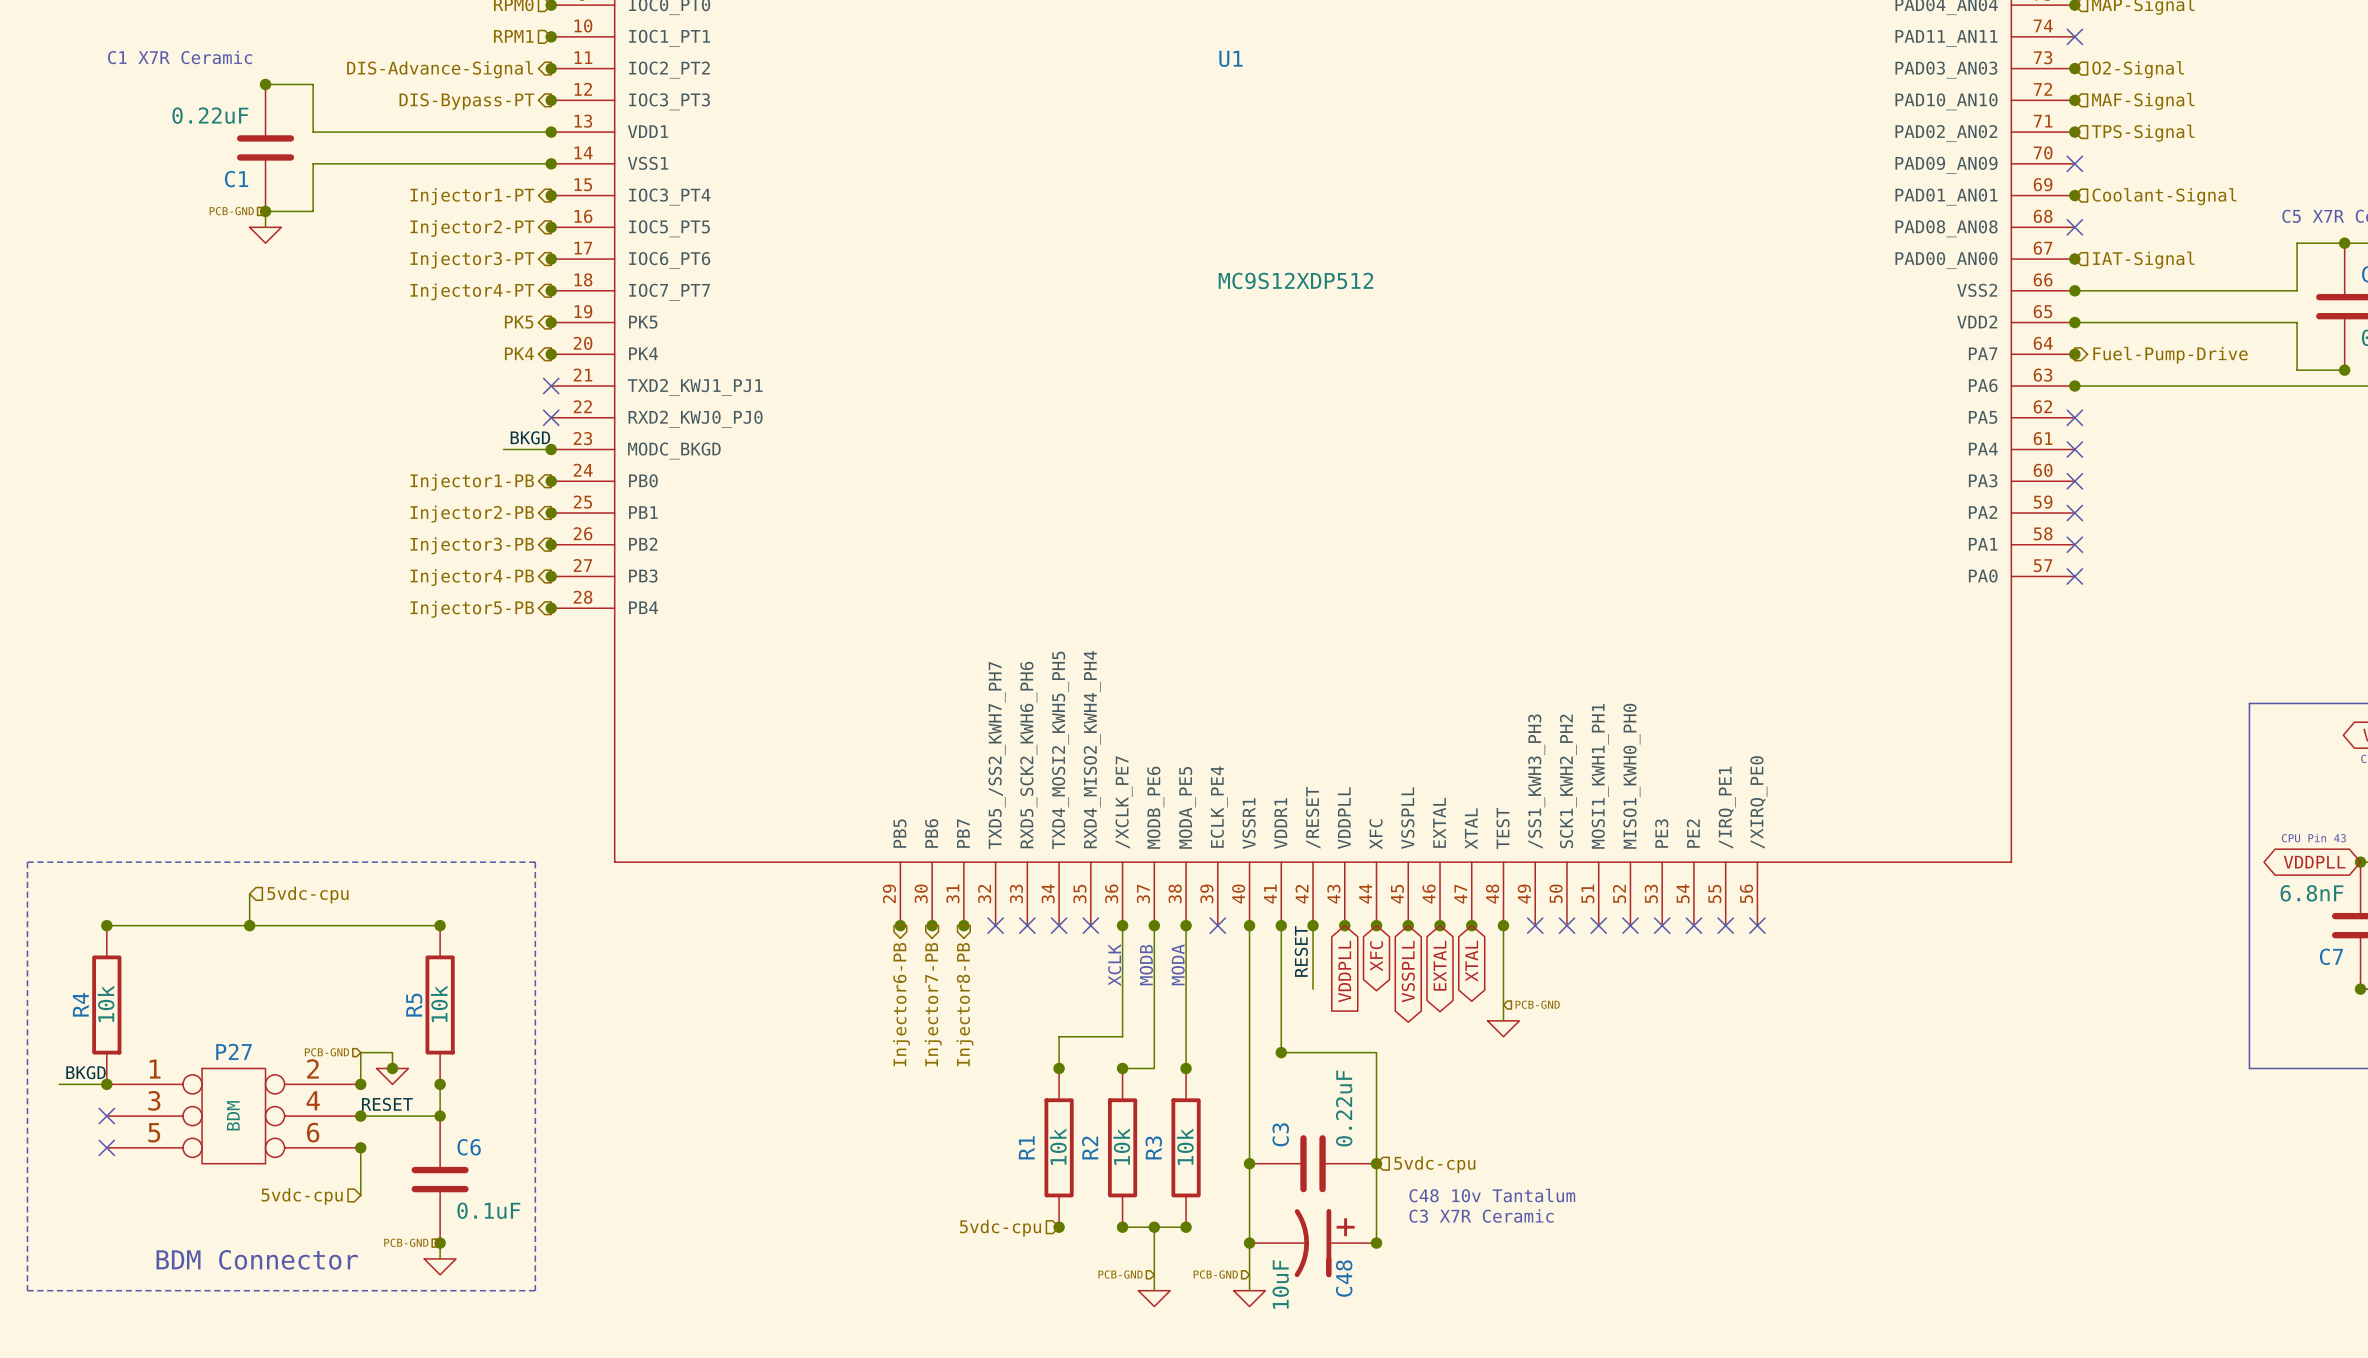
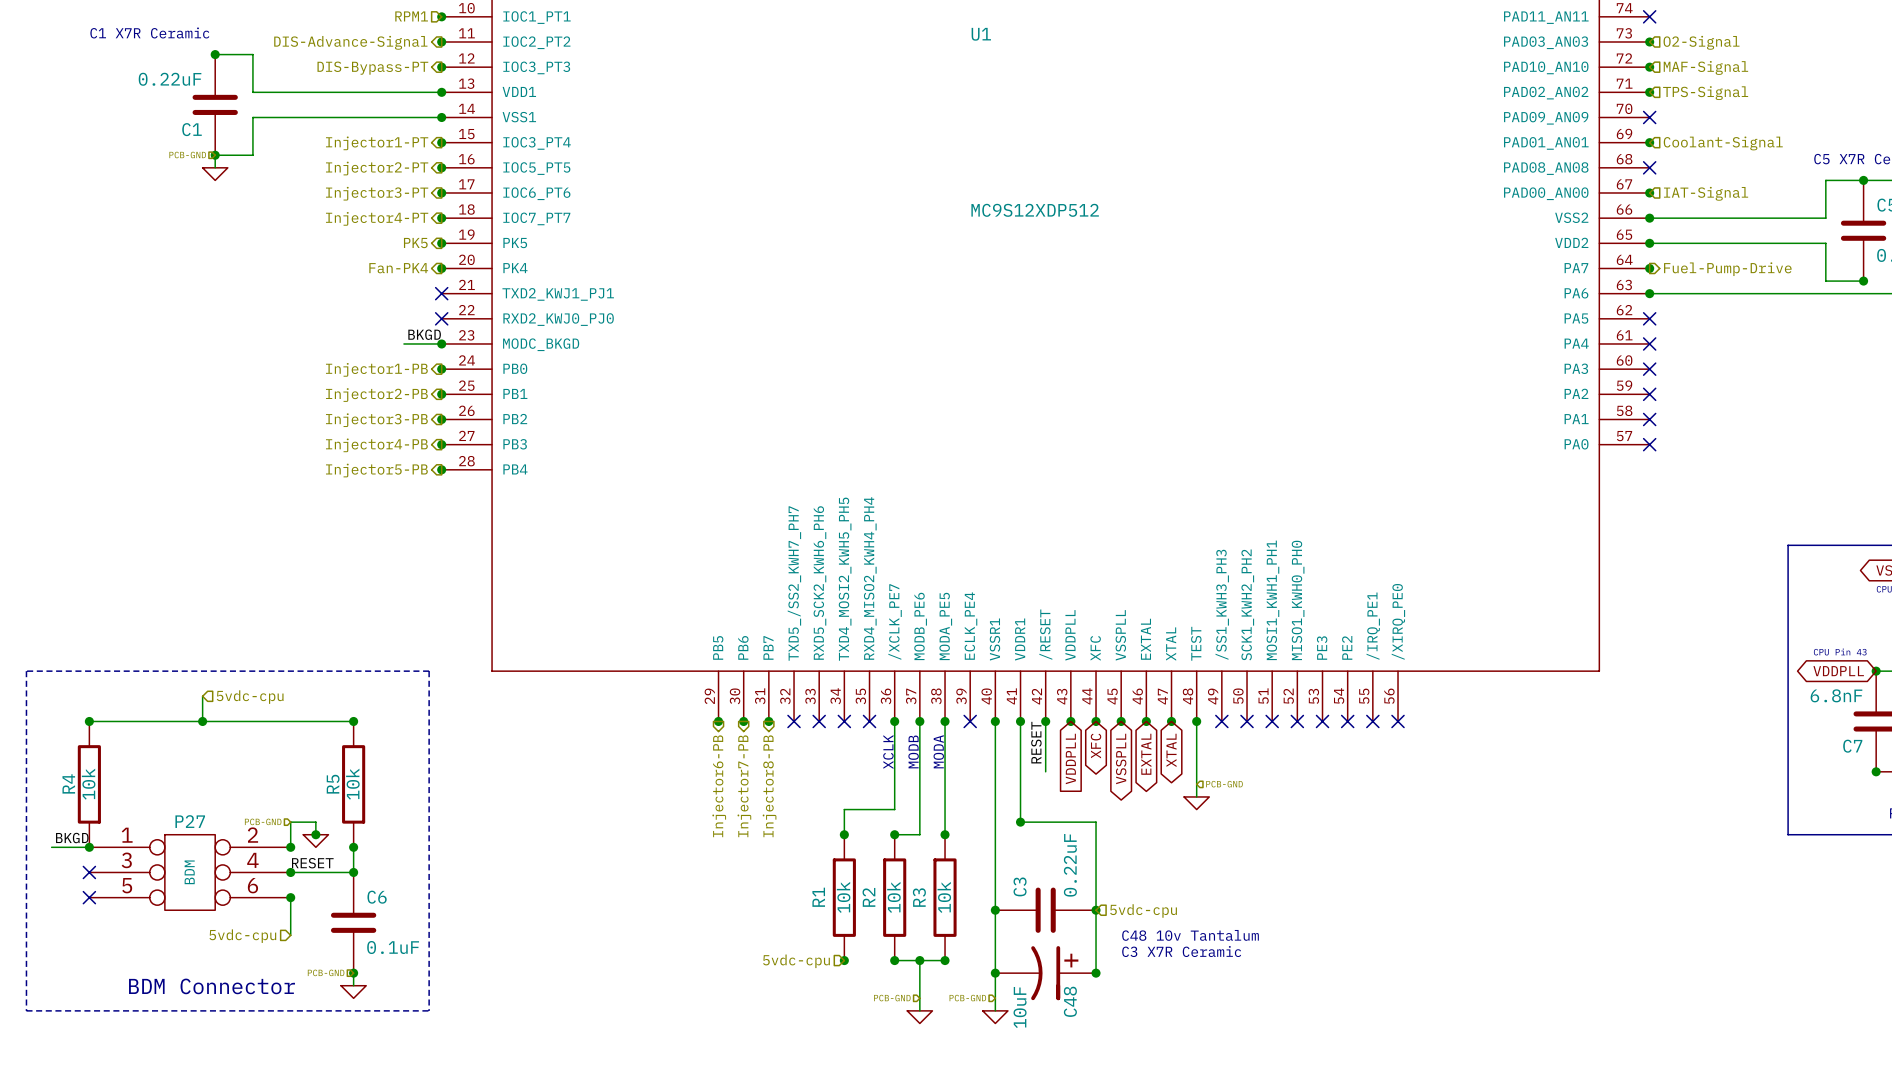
hierarchical label: PK4 (519, 353) -> Fan-PK4 (398, 268)

